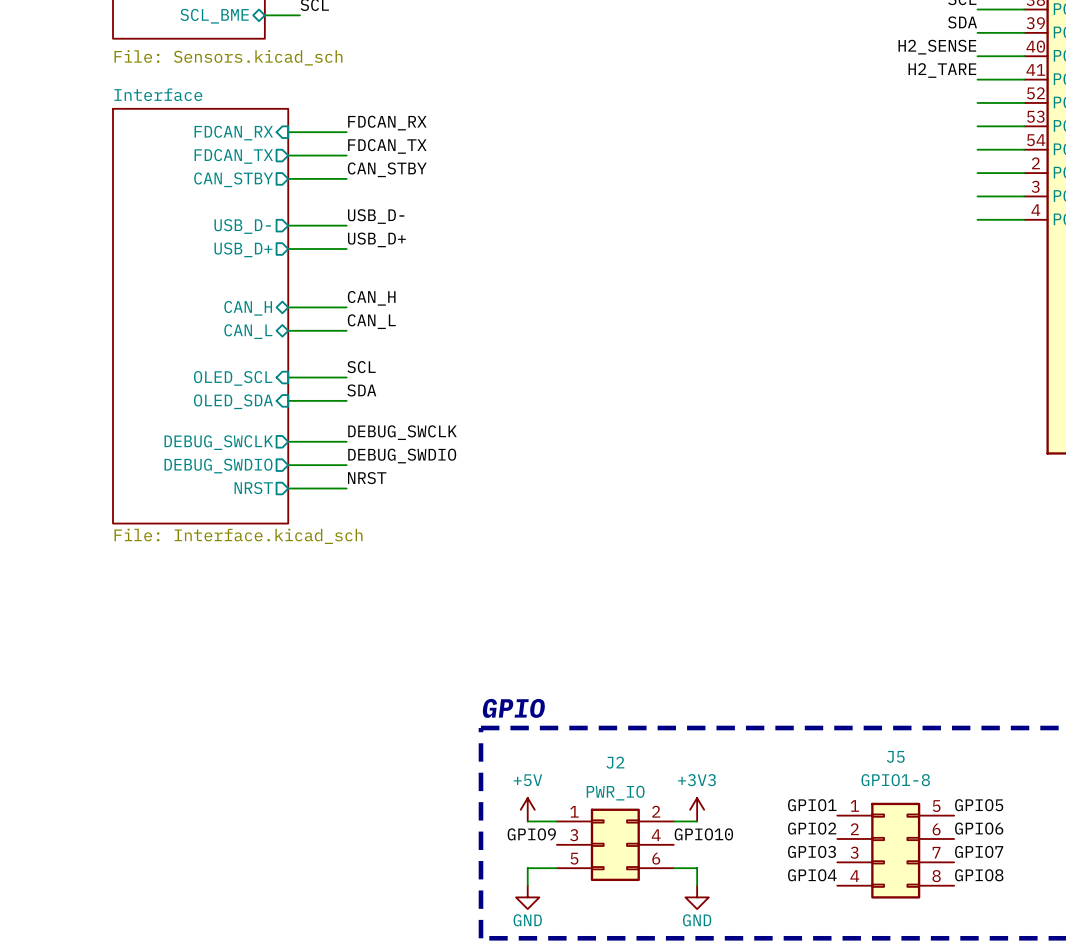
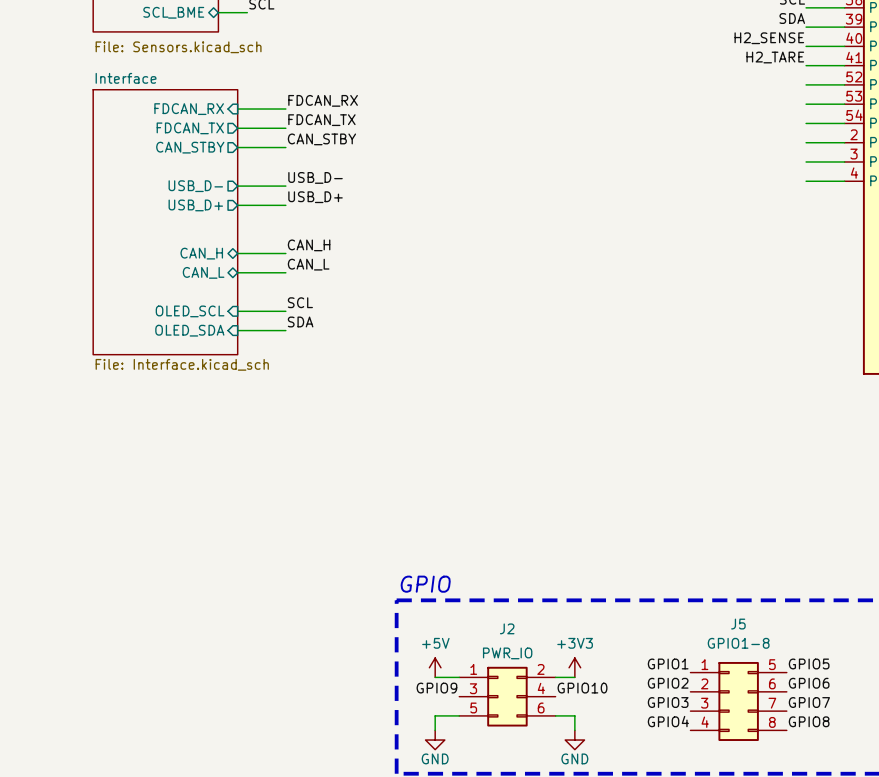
sheet Interface: none -> File: Interface.kicad_sch (165, 222)
sheet Interface: File: Interface.kicad_sch (200, 316) -> none
label: DEBUG_SWCLK (402, 432) -> none
wire: (288, 441) (346, 441) -> none
sheet pin: DEBUG_SWCLK (218, 442) -> none
label: DEBUG_SWDIO (402, 456) -> none
wire: (288, 465) (346, 465) -> none
sheet pin: DEBUG_SWDIO (218, 466) -> none
label: NRST (367, 478) -> none
sheet pin: NRST (253, 488) -> none
wire: (288, 488) (346, 488) -> none

